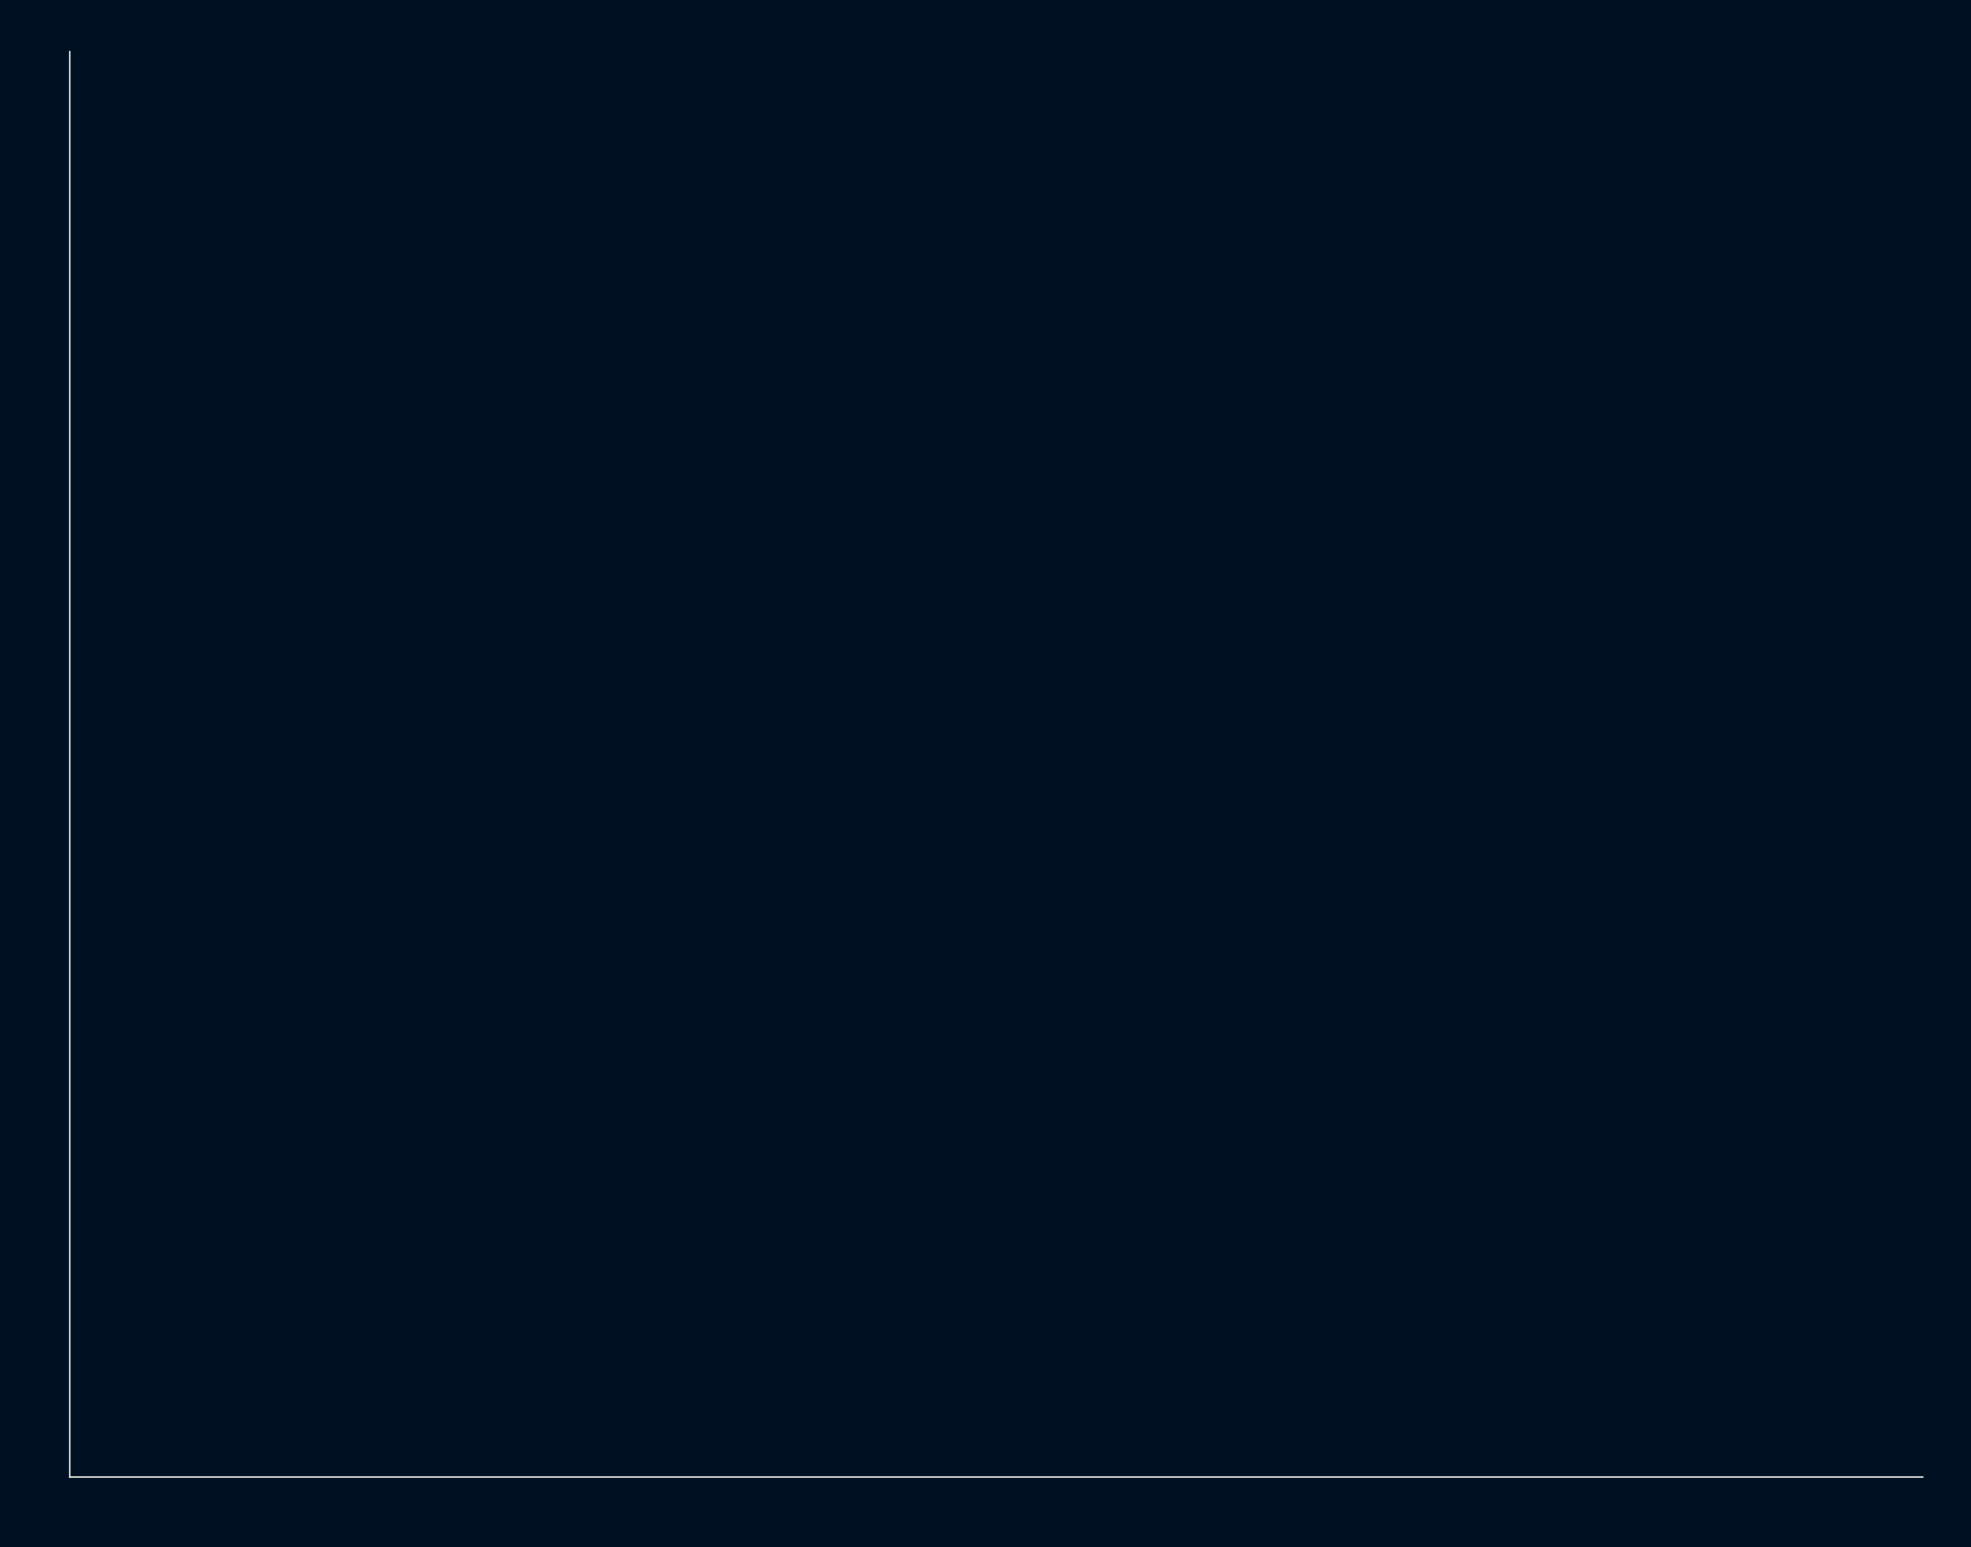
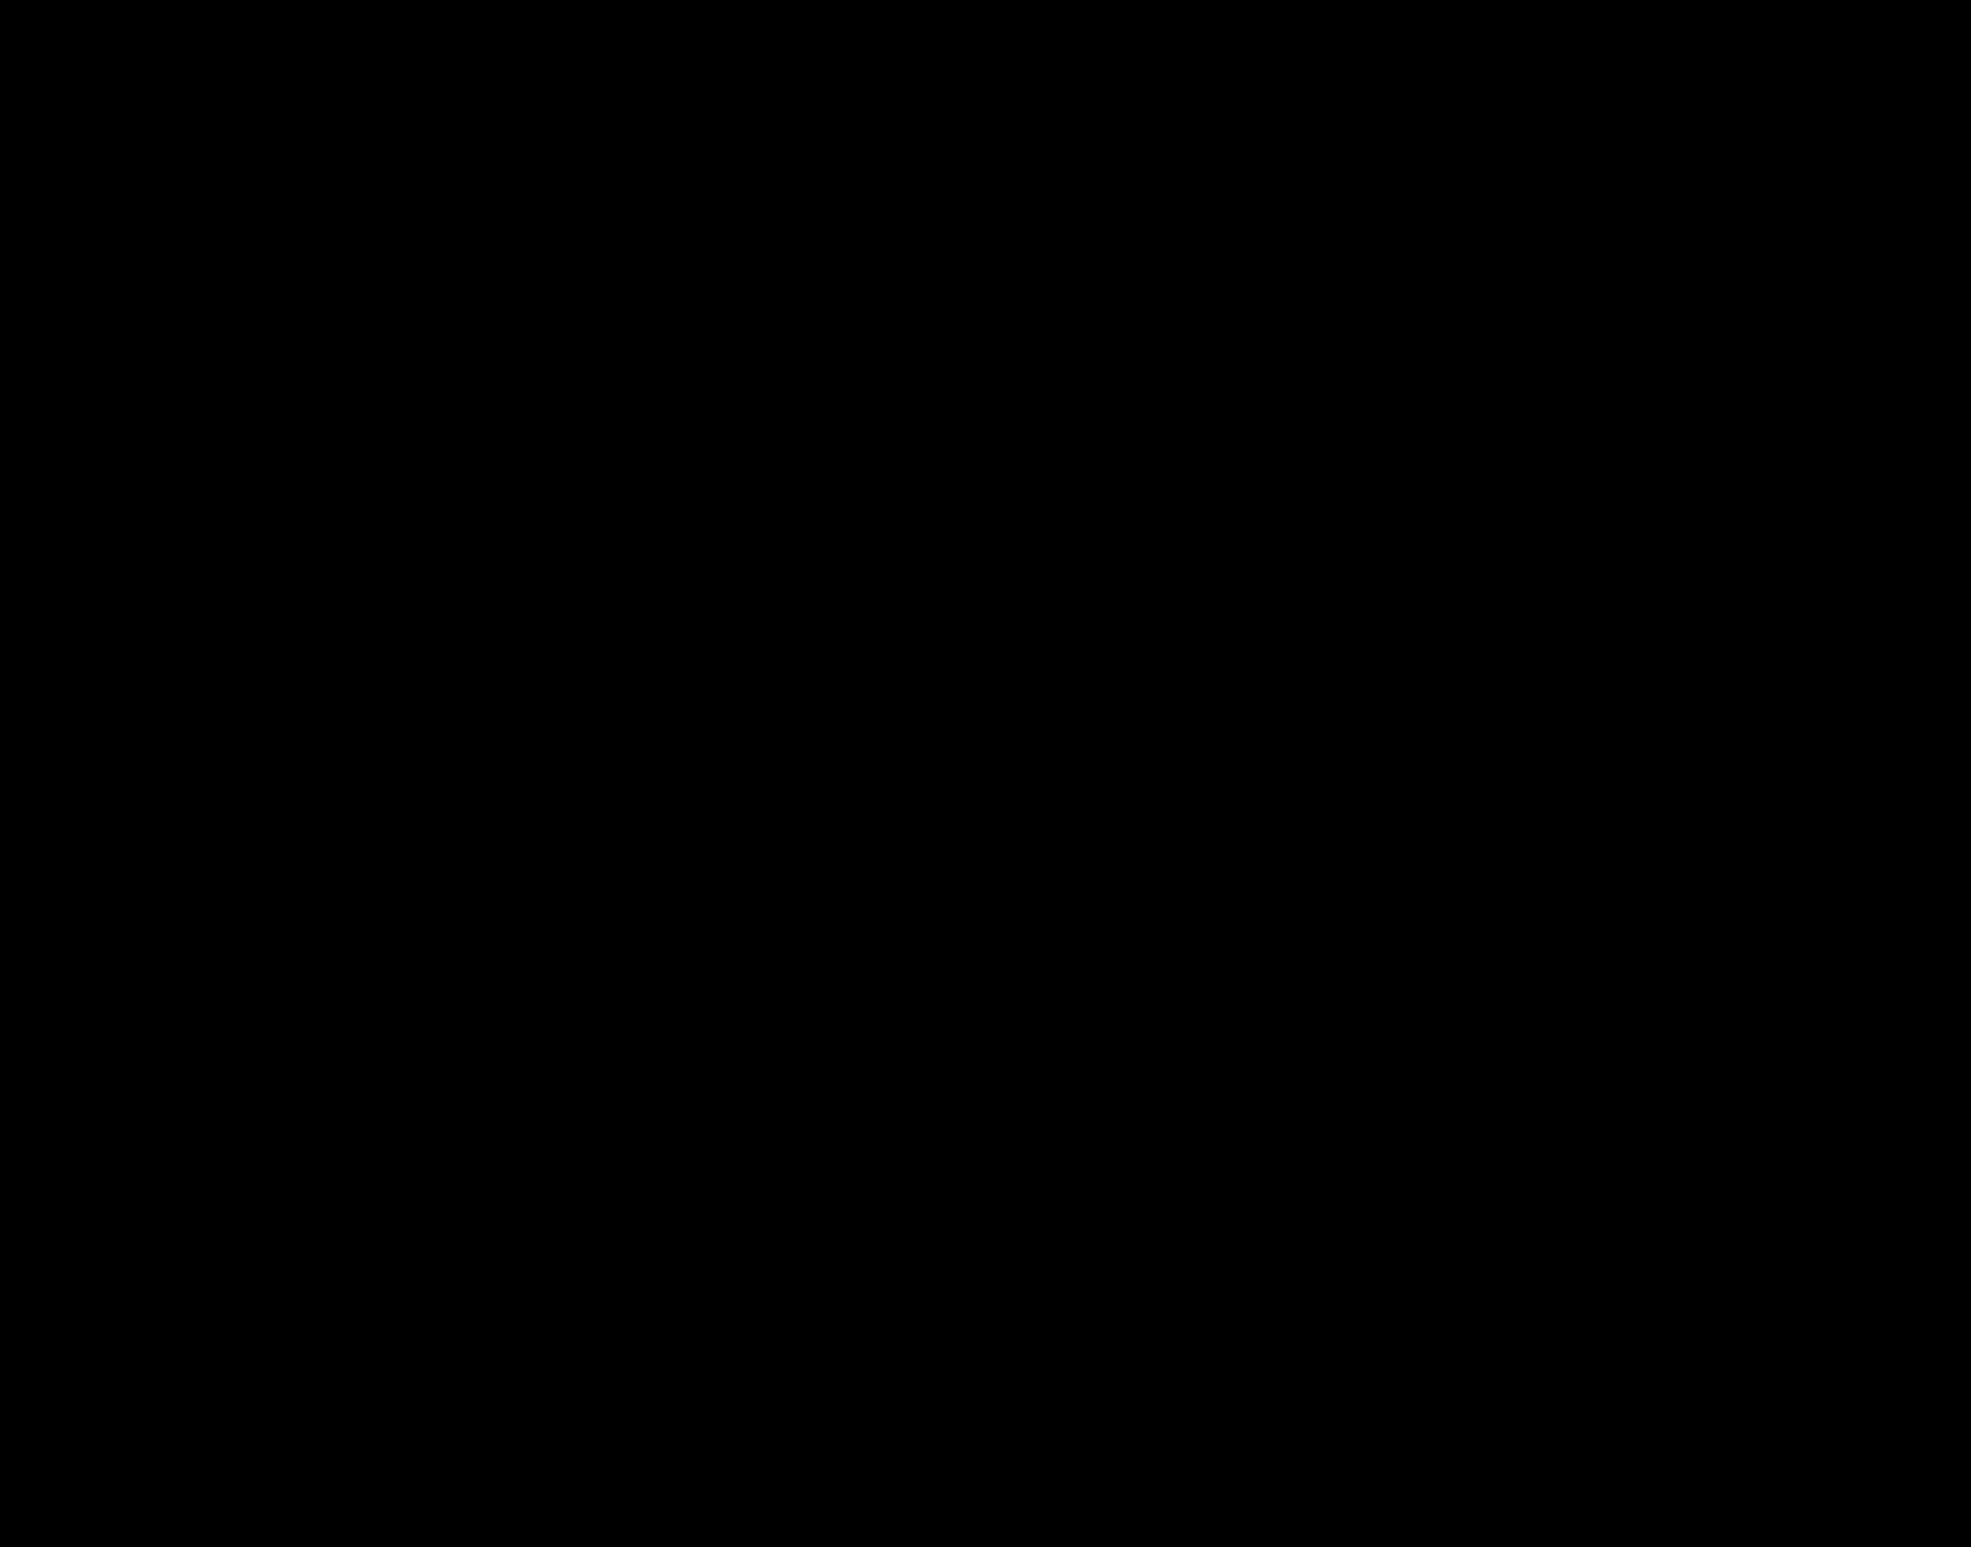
board edge: (69, 51) (69, 1477) (1922, 1477) -> none

